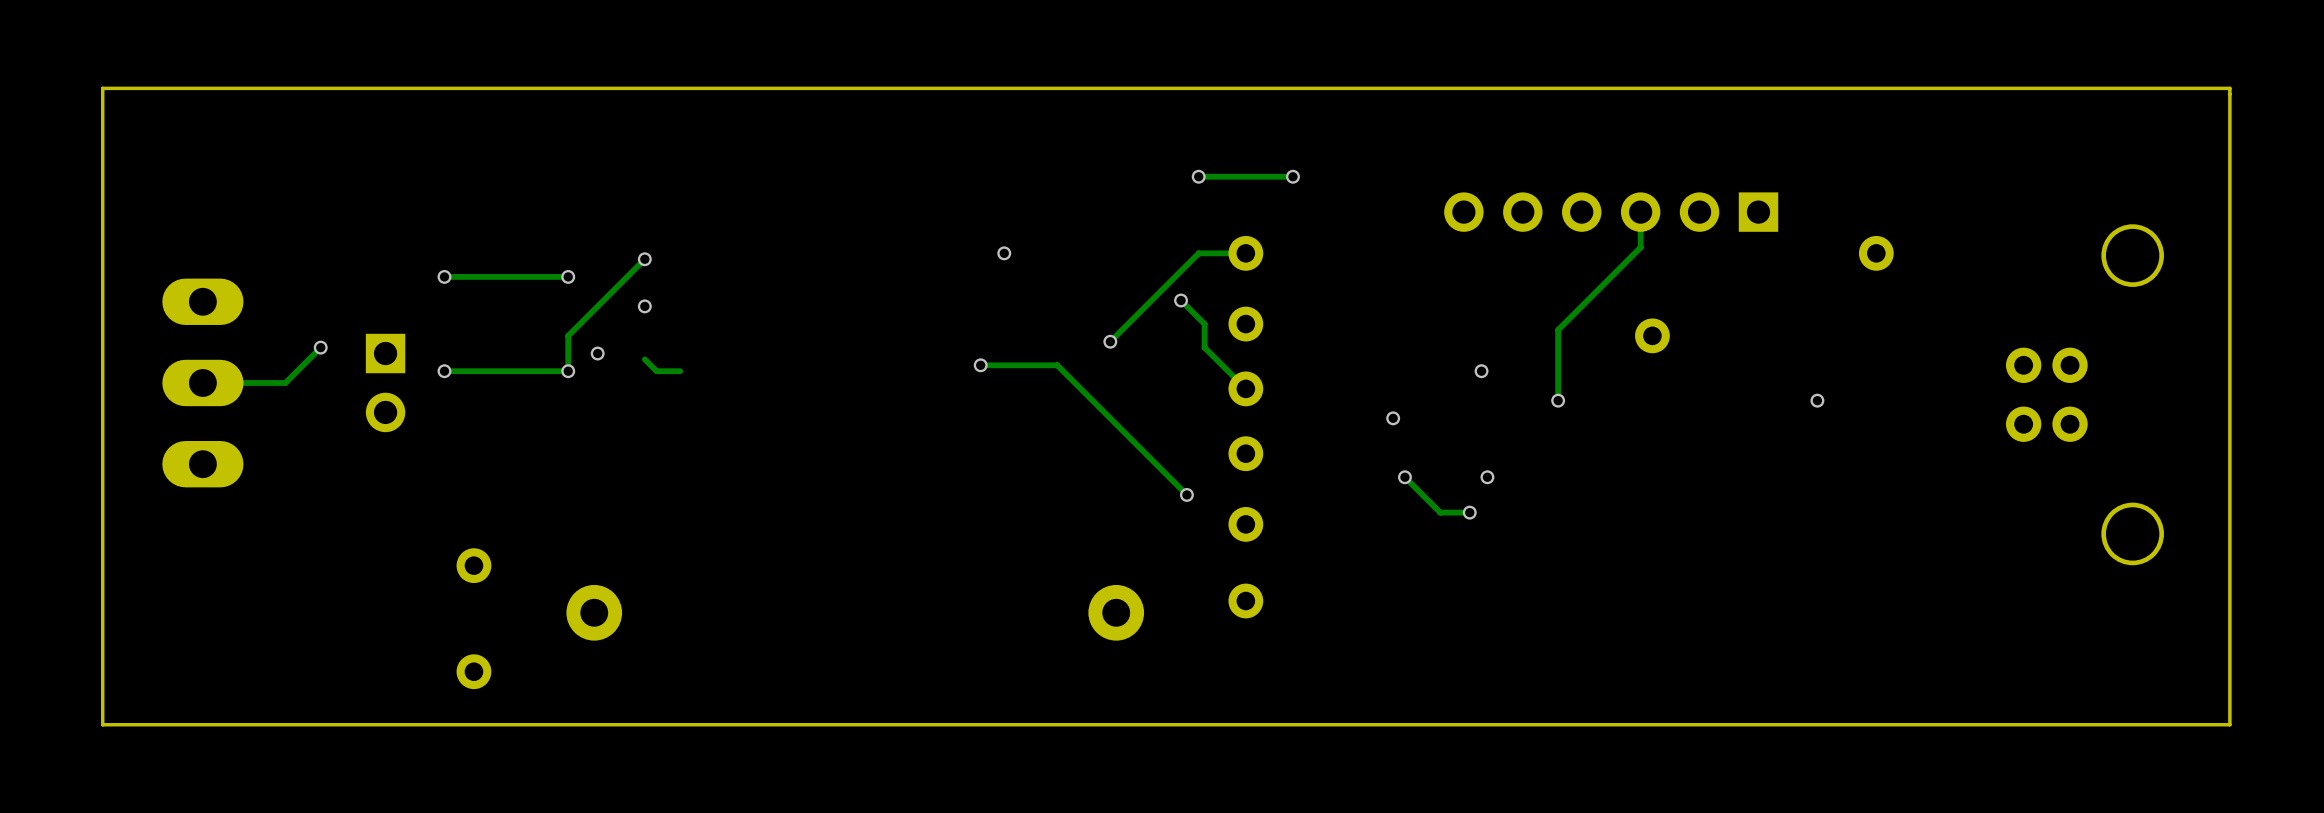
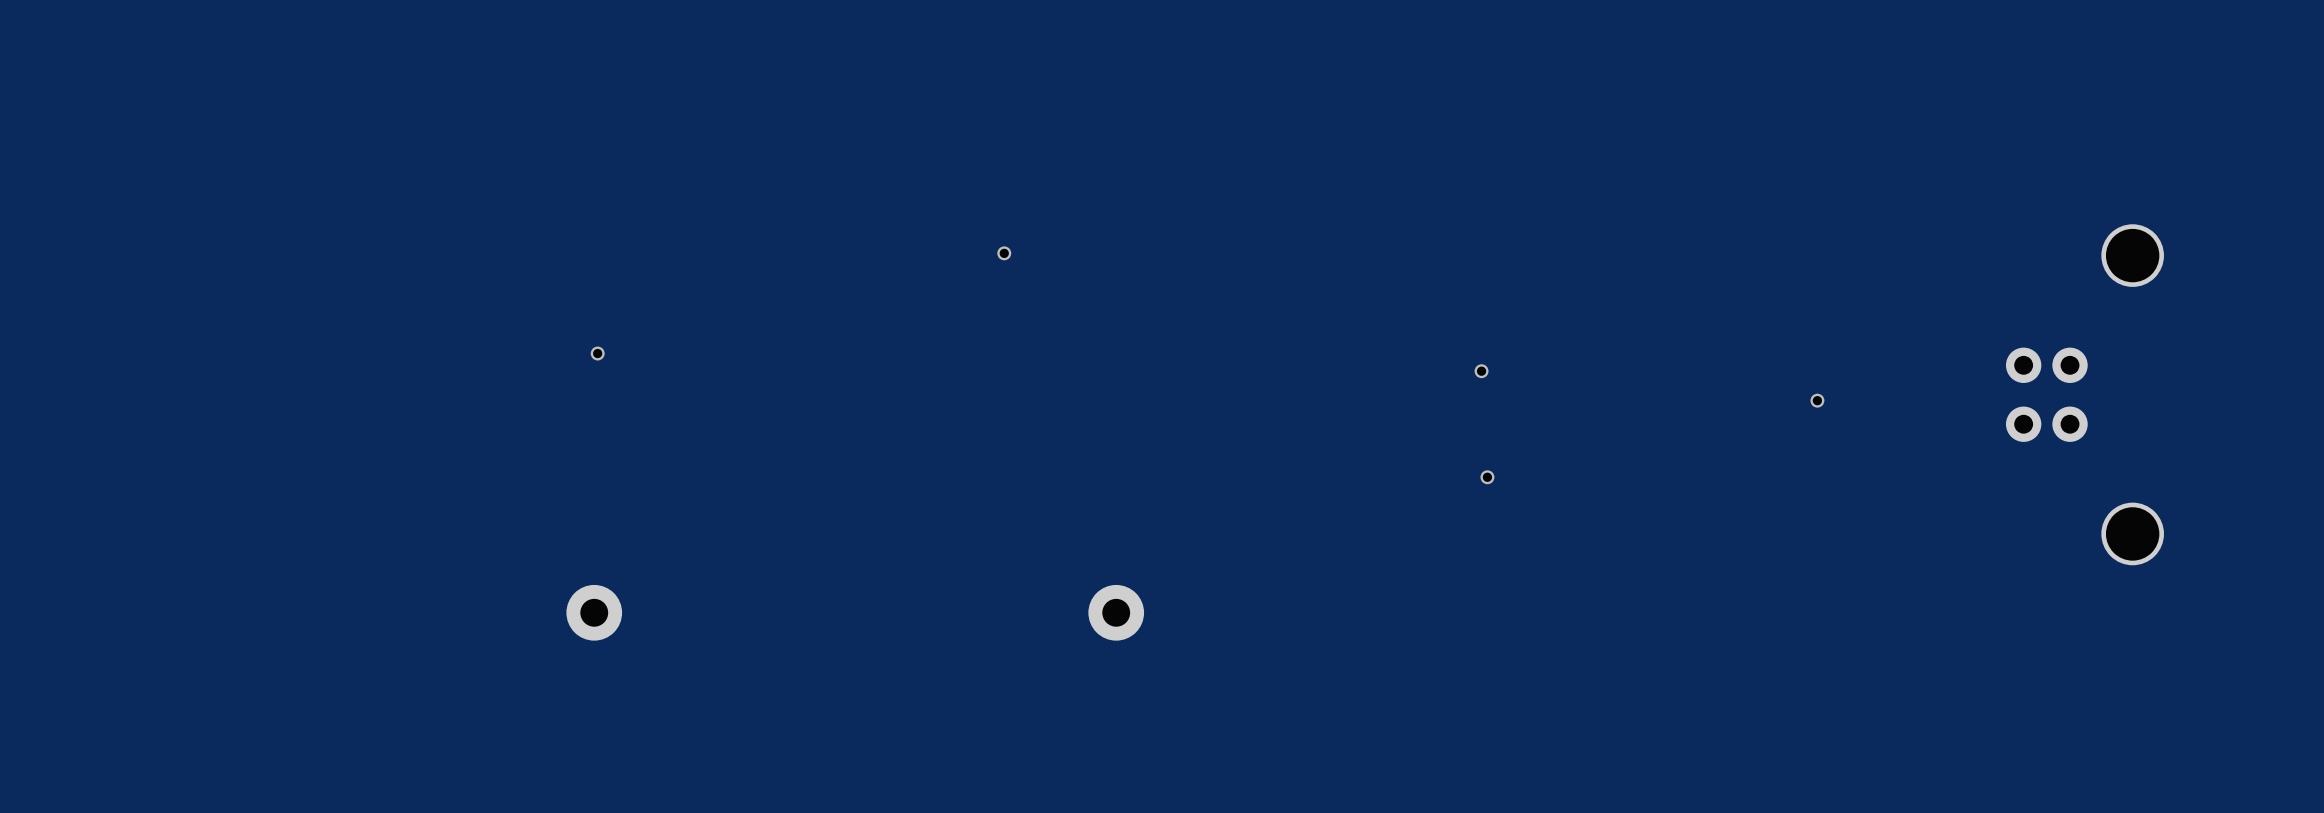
board edge: (2229, 88) (102, 88) (102, 724) (2229, 724) (2229, 88) -> none
via: (1198, 176) -> none
track: (1292, 176) (1198, 176) -> none
via: (1292, 176) -> none
part: (1611, 212) -> none
track: (1640, 212) (1640, 247) (1558, 329) (1558, 400) -> none
track: (1245, 253) (1198, 253) (1110, 341) -> none
part: (1245, 253) -> none
part: (1876, 253) -> none
track: (644, 259) (568, 335) (568, 371) (444, 371) -> none
via: (644, 259) -> none
via: (444, 276) -> none
track: (568, 276) (444, 276) -> none
via: (568, 276) -> none
track: (1181, 300) (1204, 324) (1204, 347) (1245, 388) -> none
via: (1181, 300) -> none
via: (644, 306) -> none
part: (1245, 324) -> none
part: (1652, 335) -> none
via: (1110, 341) -> none
track: (320, 347) (285, 382) (202, 382) -> none
via: (320, 347) -> none
track: (644, 359) (656, 371) (680, 371) -> none
track: (980, 365) (1057, 365) (1186, 494) -> none
via: (980, 365) -> none
via: (444, 371) -> none
via: (568, 371) -> none
part: (202, 382) -> none
part: (385, 382) -> none
part: (1245, 388) -> none
via: (1558, 400) -> none
via: (1393, 418) -> none
part: (1245, 453) -> none
track: (1404, 477) (1440, 512) (1469, 512) -> none
via: (1404, 477) -> none
via: (1186, 494) -> none
via: (1469, 512) -> none
part: (1245, 524) -> none
part: (473, 565) -> none
part: (1245, 601) -> none
part: (473, 671) -> none

